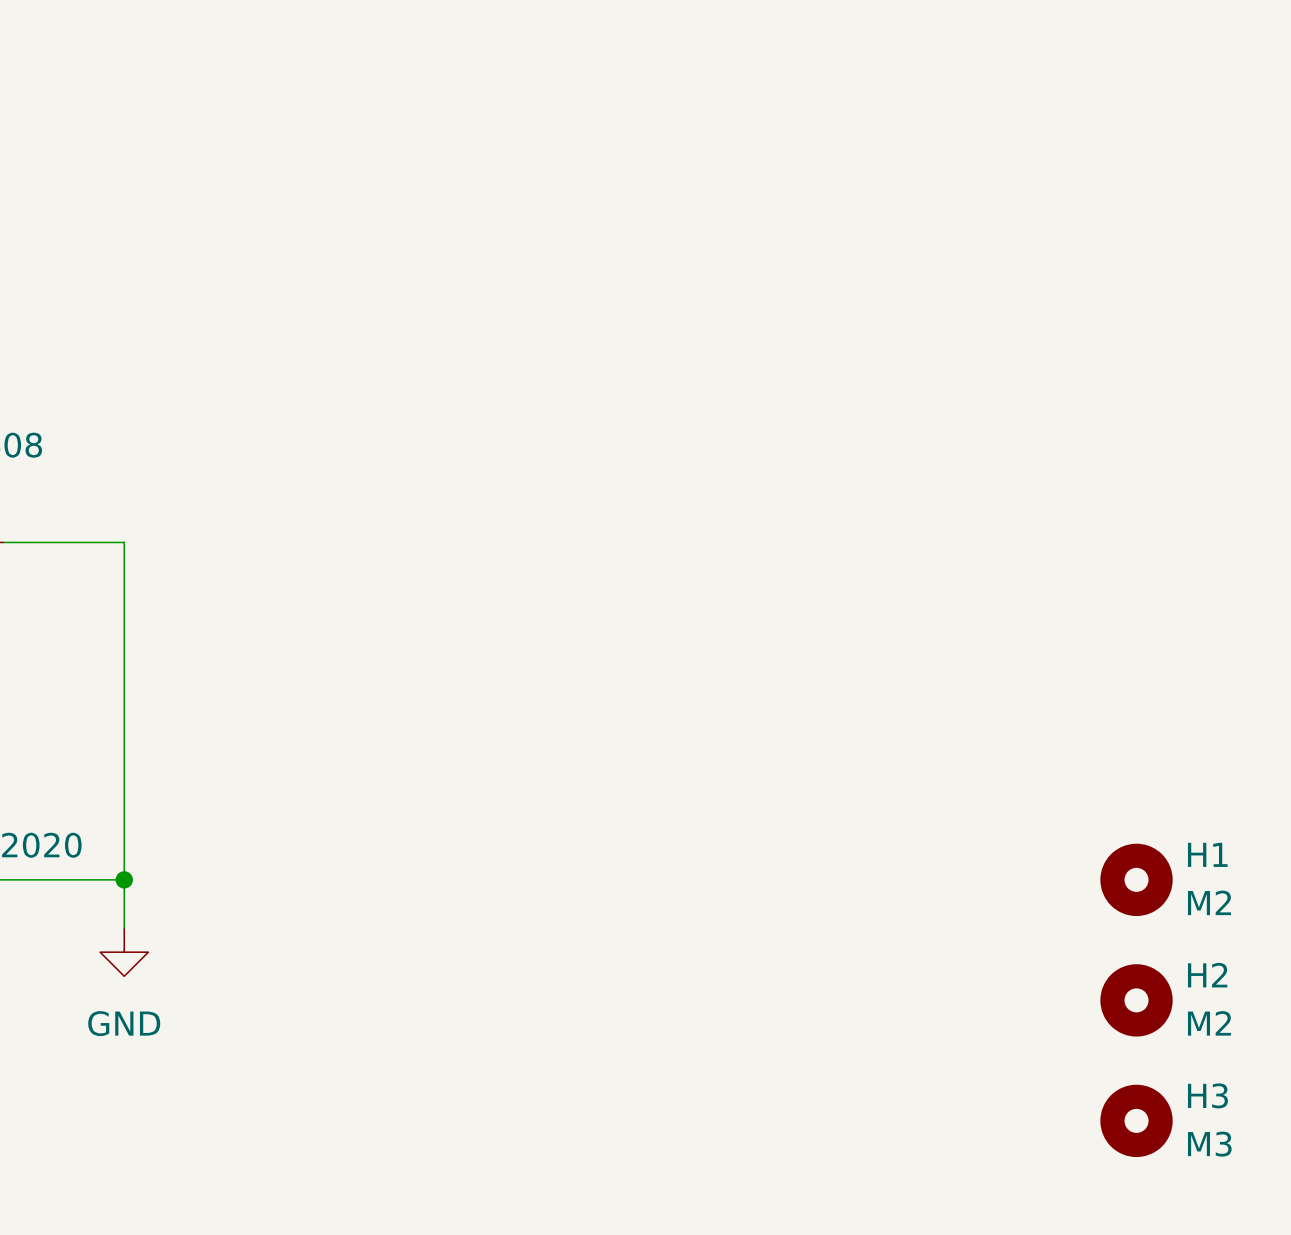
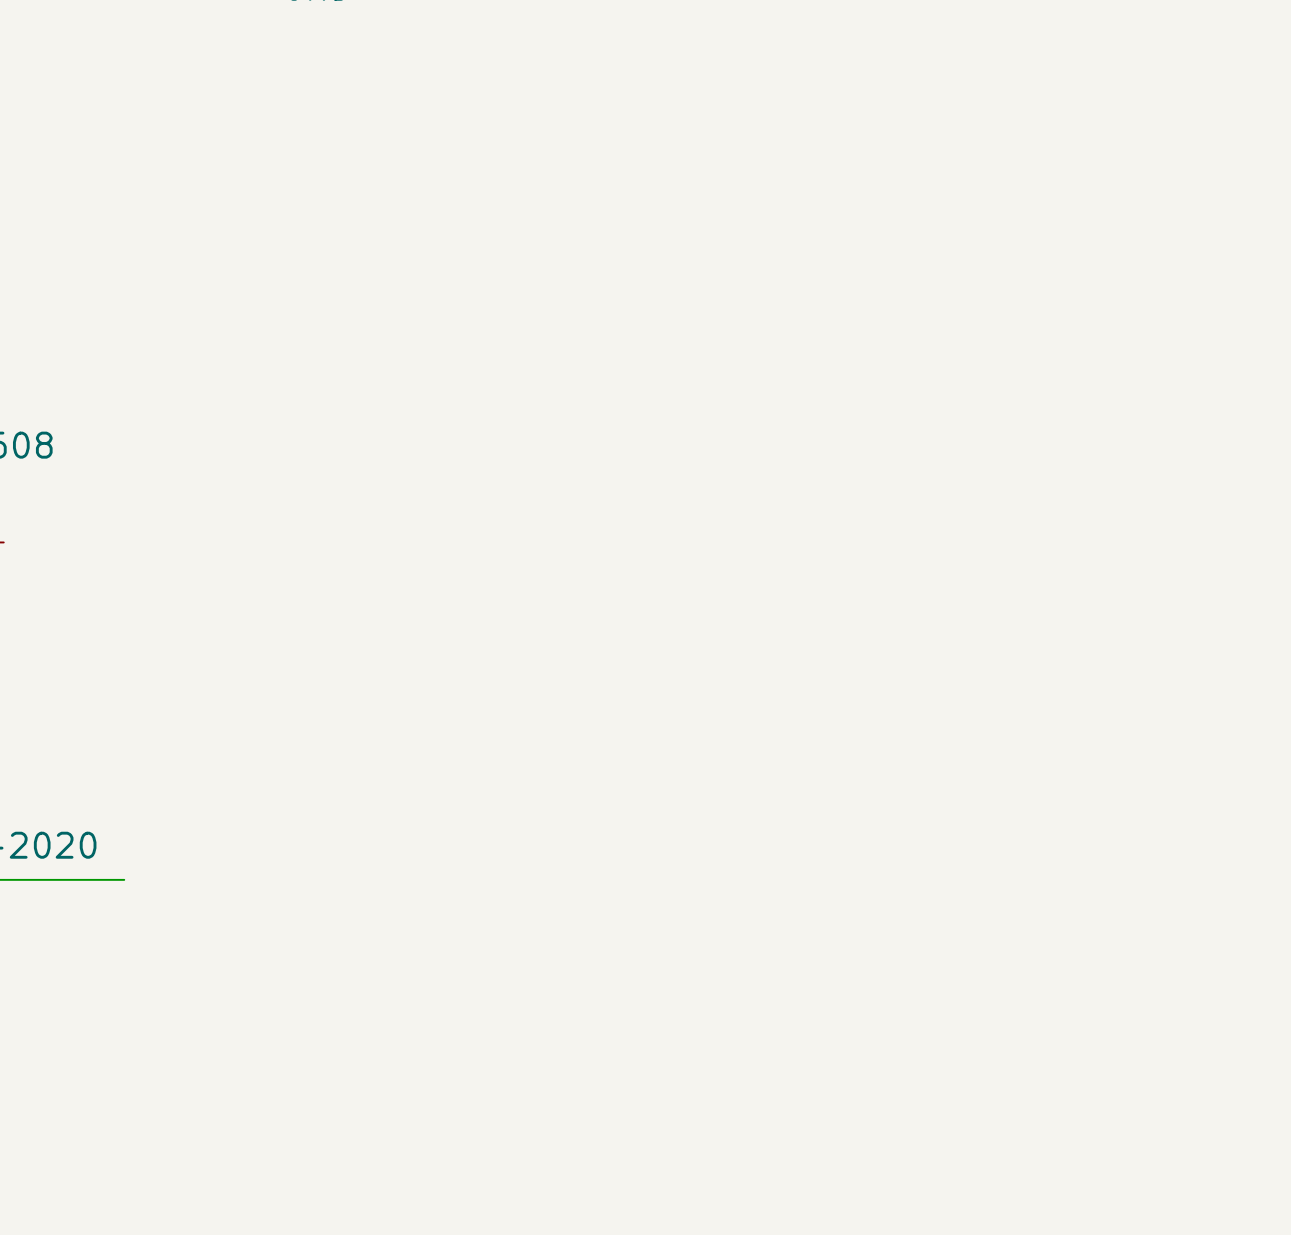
wire: (3, 542) (124, 542) (124, 928) -> none
junction: (124, 879) -> none
H1: M2 (1136, 879) -> none
power symbol: GND (124, 952) -> none
H2: M2 (1136, 1000) -> none
H3: M3 (1136, 1120) -> none

